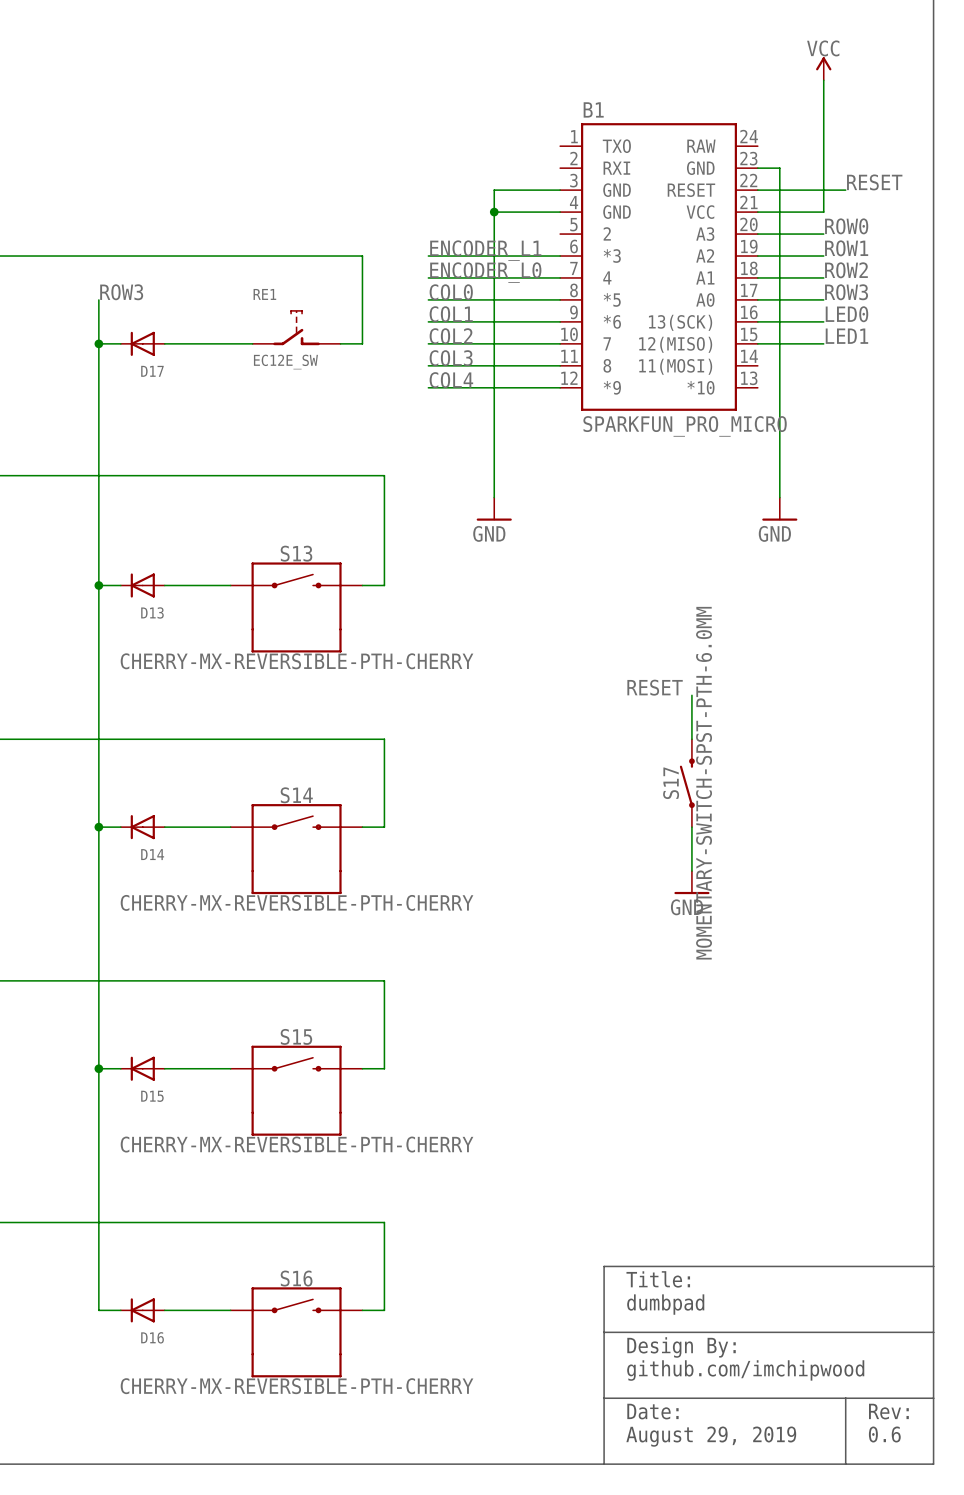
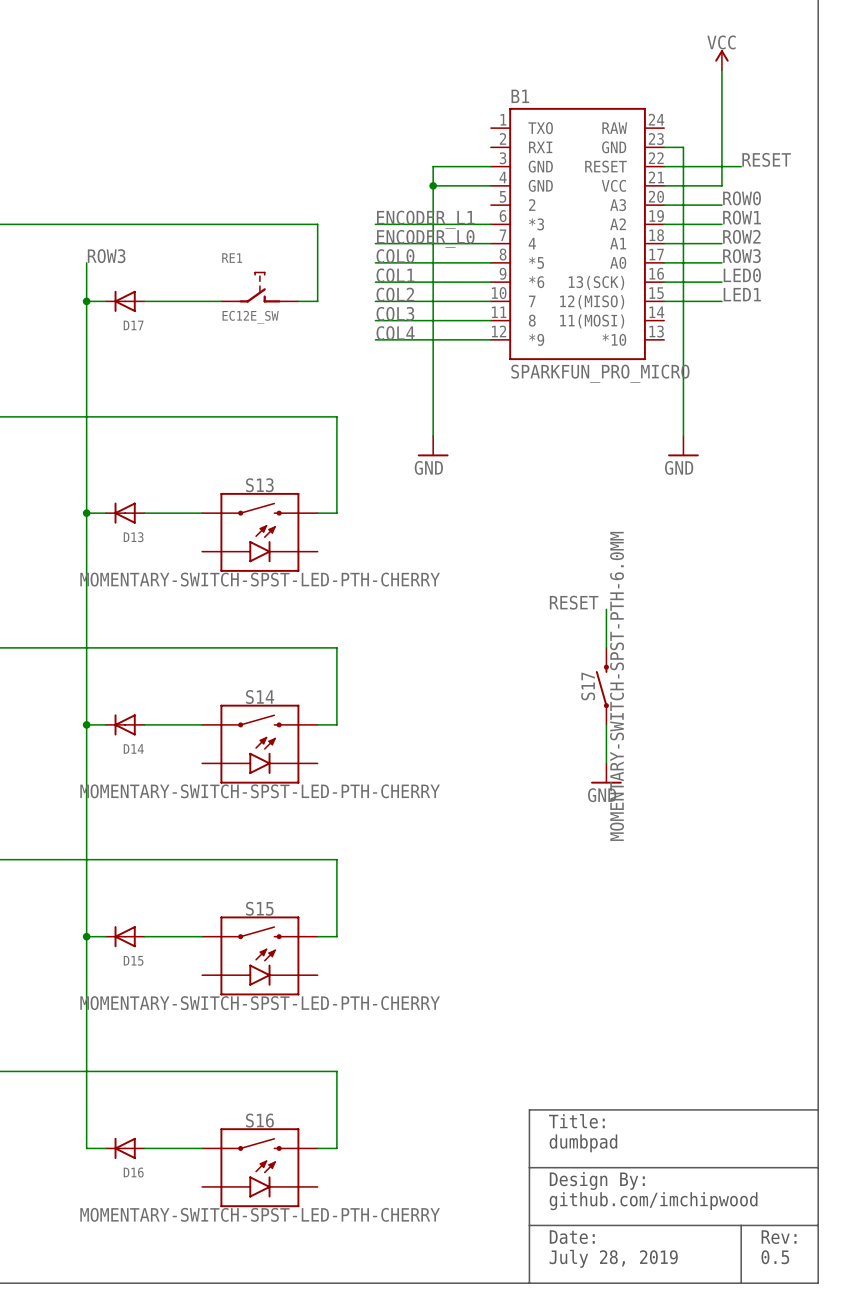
S13 symbol: [230, 562, 363, 653] -> [202, 492, 318, 572]
S13 value: CHERRY-MX-REVERSIBLE-PTH-CHERRY (297, 661) -> MOMENTARY-SWITCH-SPST-LED-PTH-CHERRY (260, 579)
S14 symbol: [230, 804, 363, 895] -> [202, 704, 318, 784]
S14 value: CHERRY-MX-REVERSIBLE-PTH-CHERRY (297, 902) -> MOMENTARY-SWITCH-SPST-LED-PTH-CHERRY (260, 791)
S15 symbol: [230, 1045, 363, 1136] -> [202, 916, 318, 996]
S15 value: CHERRY-MX-REVERSIBLE-PTH-CHERRY (297, 1144) -> MOMENTARY-SWITCH-SPST-LED-PTH-CHERRY (260, 1003)
S16 symbol: [230, 1287, 363, 1378] -> [202, 1128, 318, 1208]
S16 value: CHERRY-MX-REVERSIBLE-PTH-CHERRY (297, 1386) -> MOMENTARY-SWITCH-SPST-LED-PTH-CHERRY (260, 1214)
text: 0.6 (884, 1434) -> 0.5 (775, 1257)
text: August 29, 2019 (711, 1436) -> July 28, 2019 (613, 1258)

